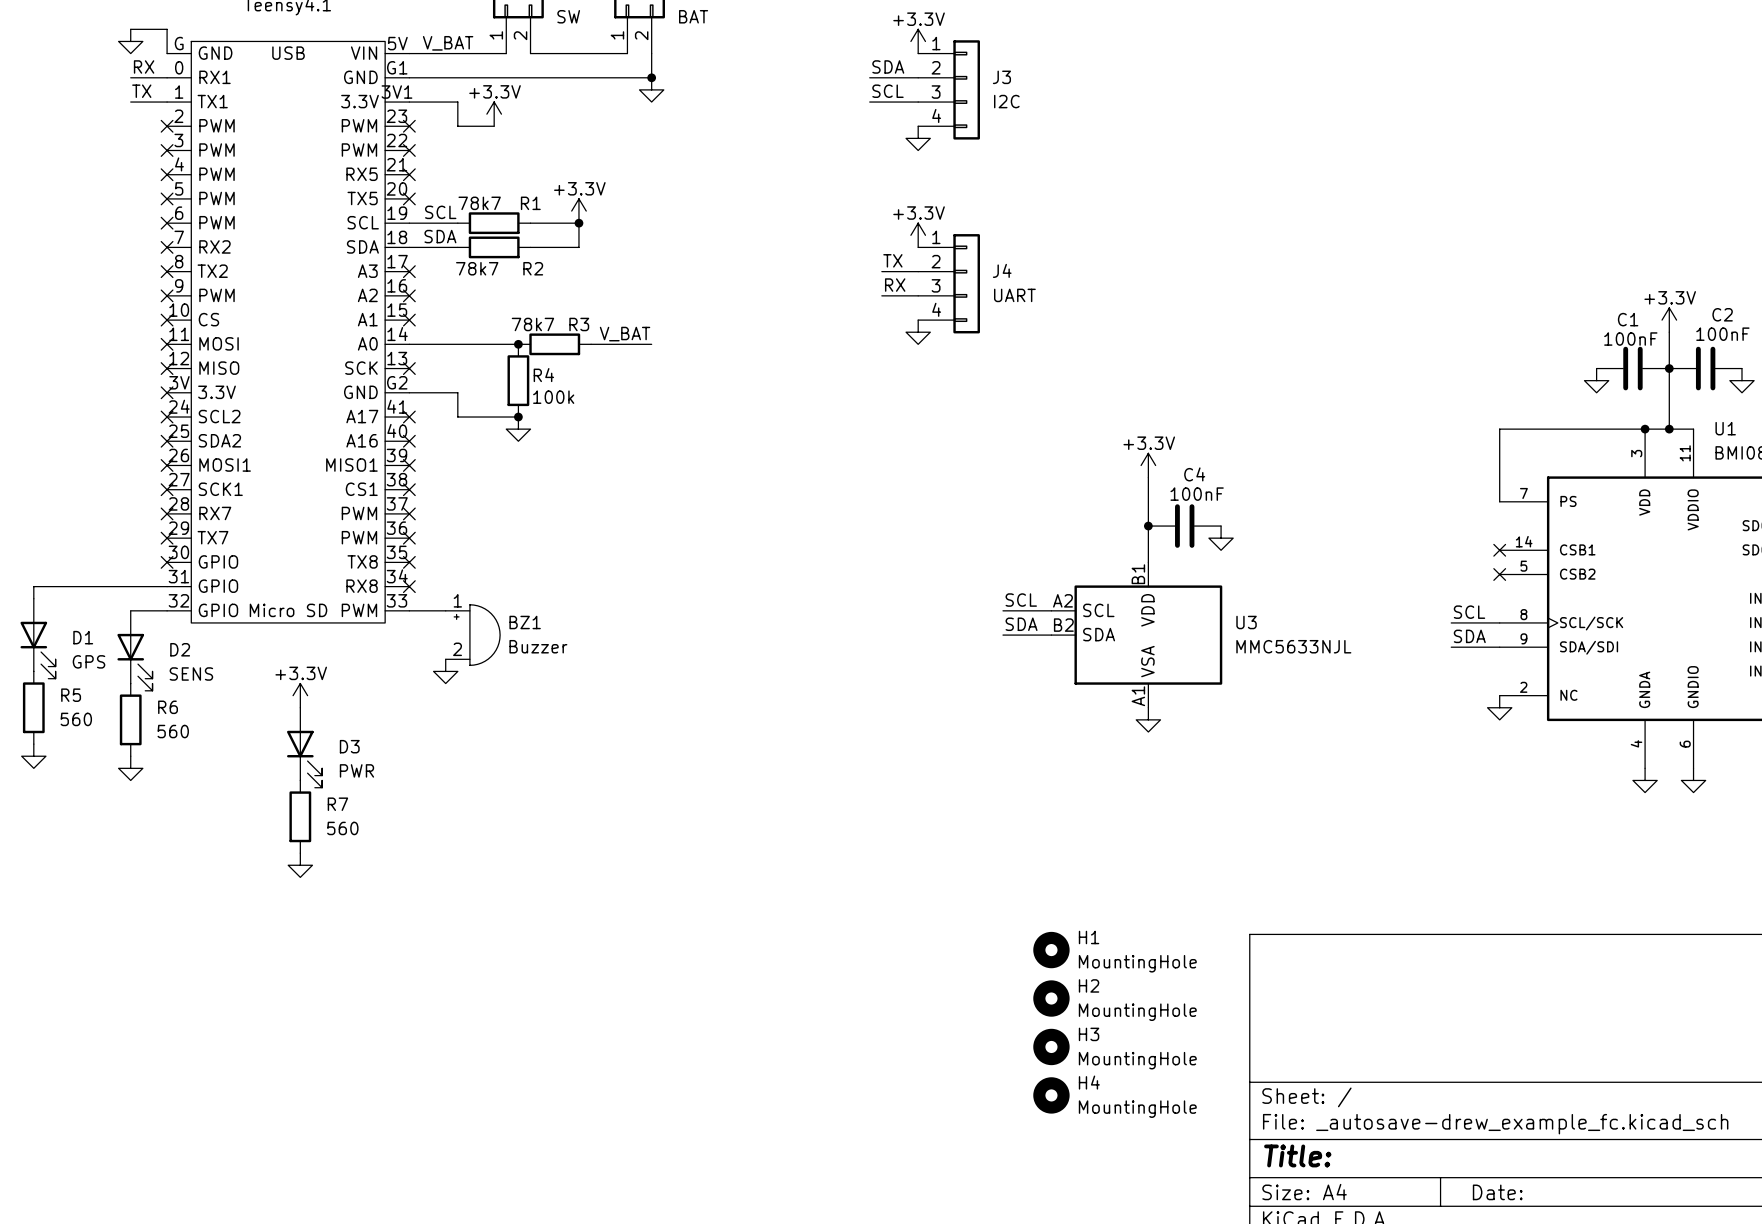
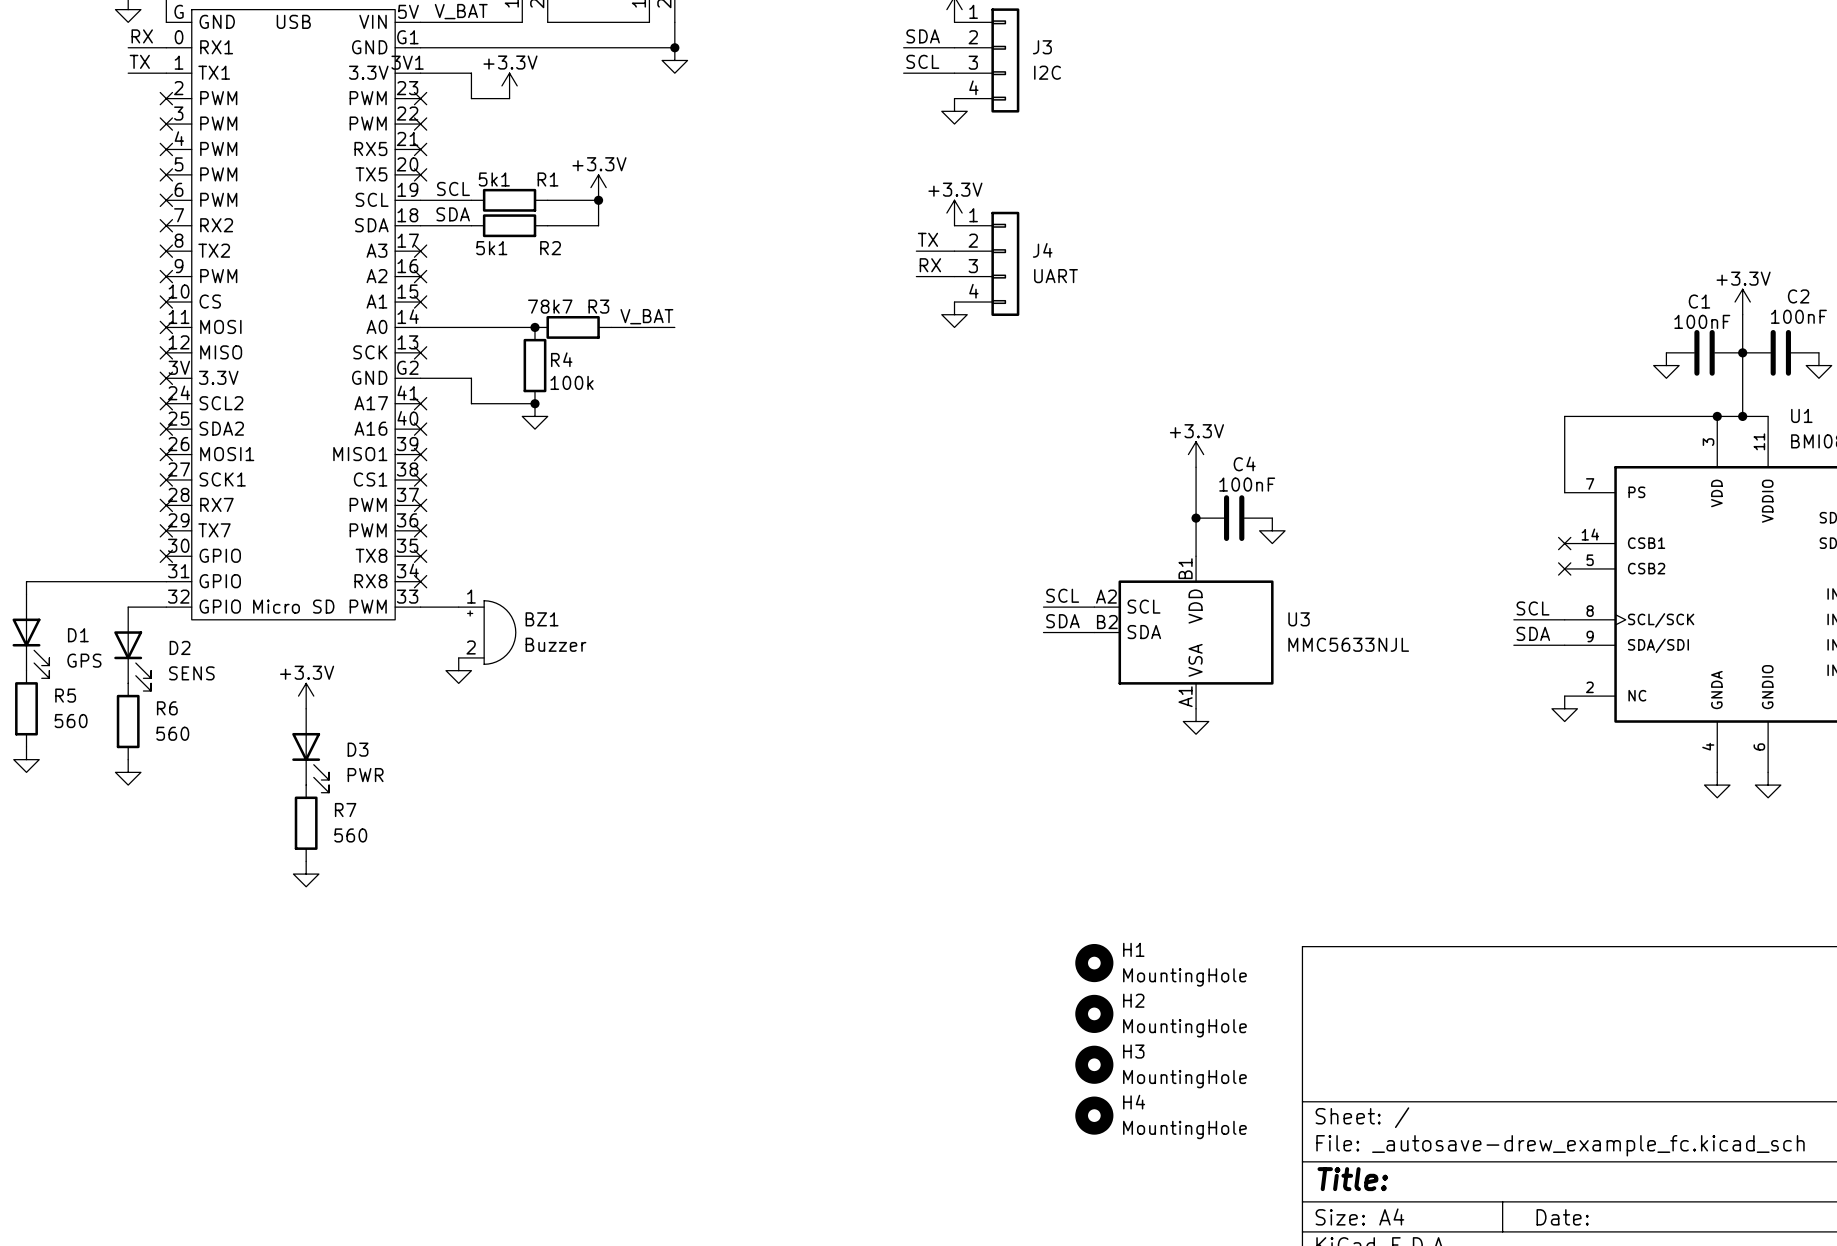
R1 value: 78k7 (479, 203) -> 5k1 (494, 179)
R2 value: 78k7 (477, 268) -> 5k1 (491, 248)

